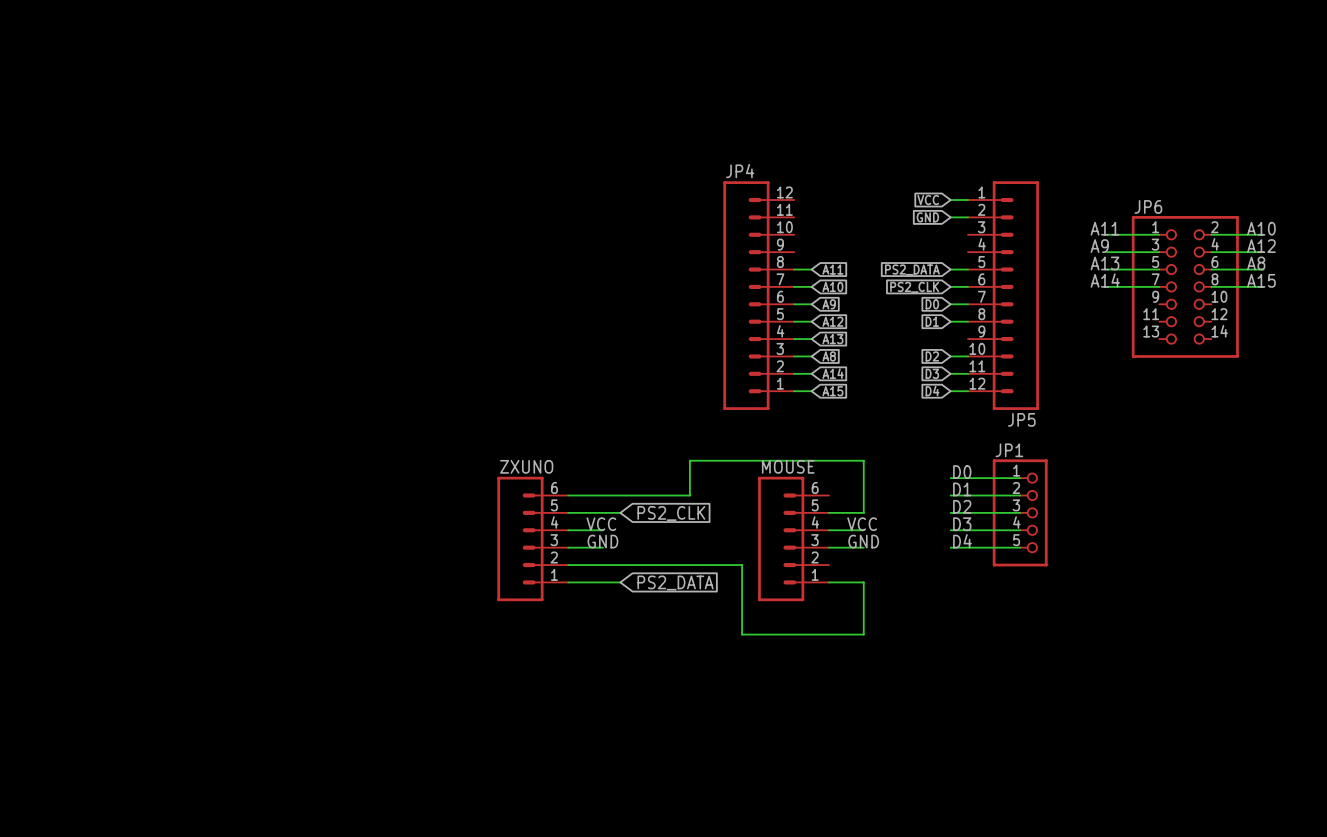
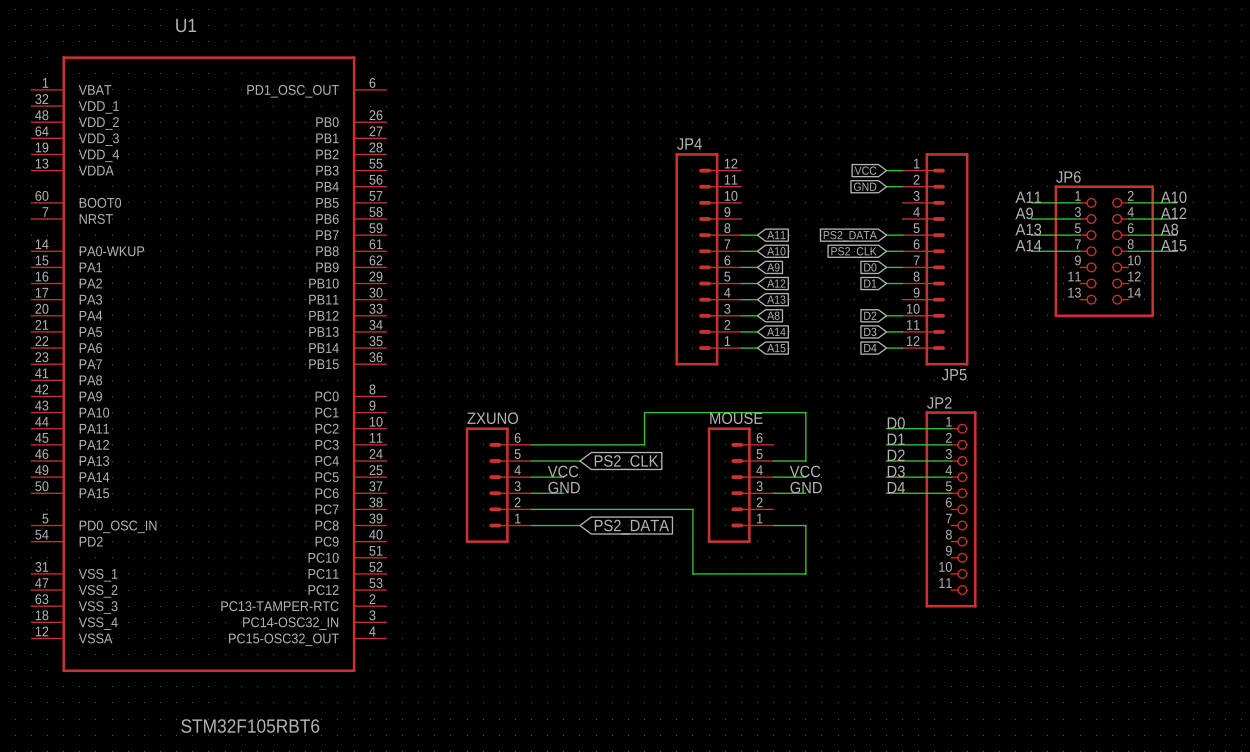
U1: none -> STM32F105RBT6 (208, 364)
JP1: (1020, 512) -> none
JP2: none -> (951, 509)

